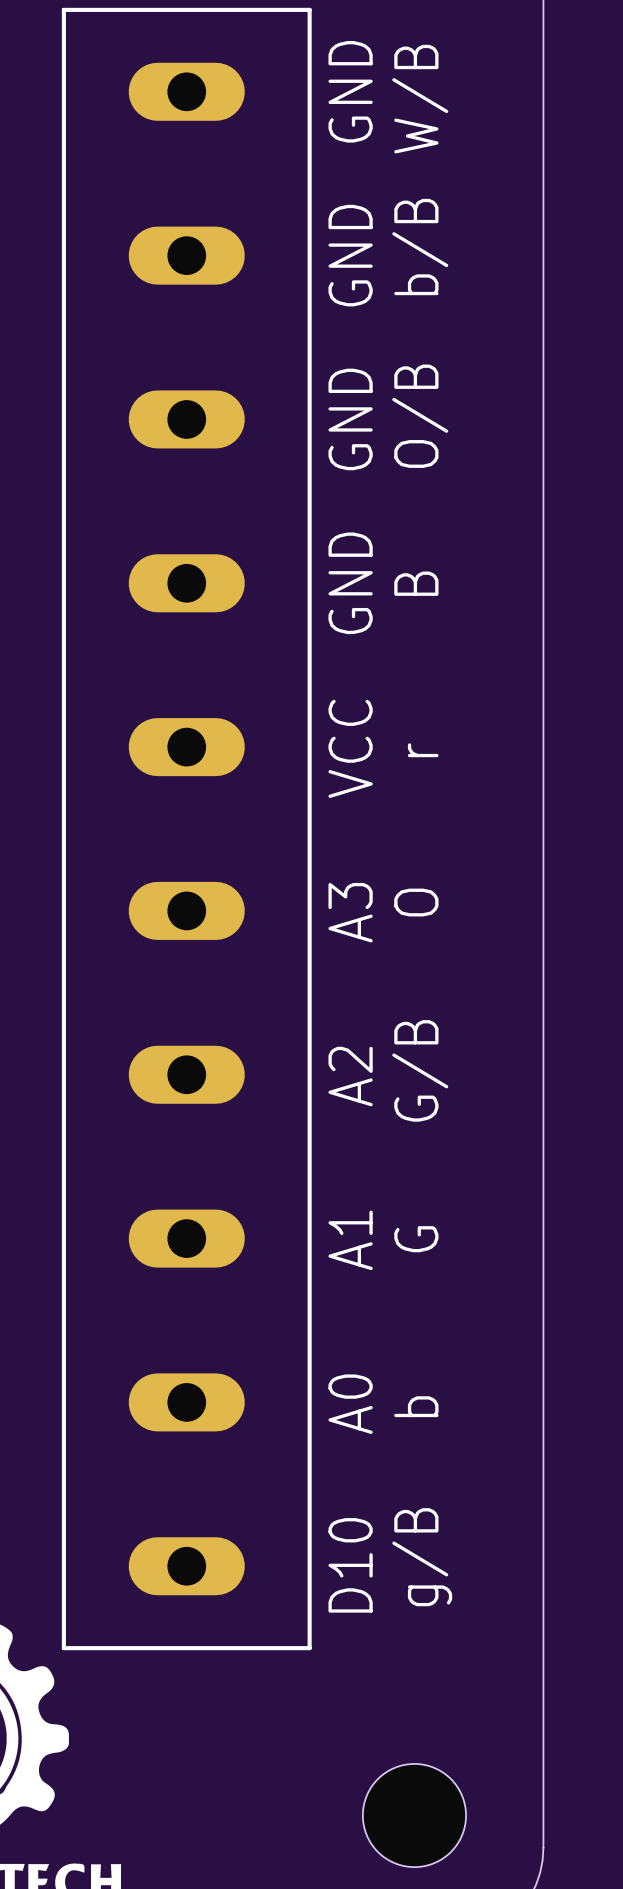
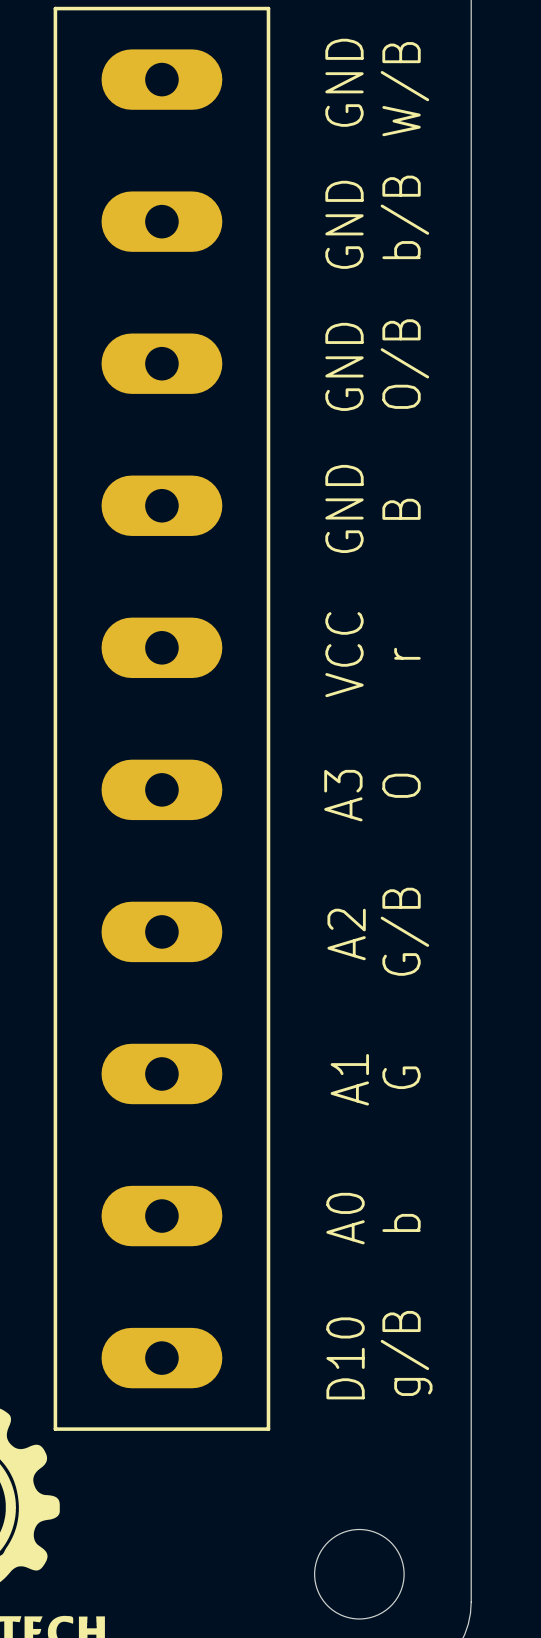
part footprint: [61, 7, 312, 1651] -> [53, 6, 271, 1431]
text position: GND (350, 91) -> GND (344, 82)
text position: W/B (420, 99) -> W/B (404, 89)
text position: b/B (420, 247) -> b/B (404, 217)
text position: GND (350, 255) -> GND (344, 224)
text position: O/B (420, 416) -> O/B (404, 364)
text position: GND (350, 419) -> GND (344, 366)
text position: GND (350, 583) -> GND (344, 508)
text position: B (416, 583) -> B (401, 509)
text position: VCC (350, 748) -> VCC (344, 654)
text position: r (423, 750) -> r (407, 653)
text position: O (416, 902) -> O (401, 785)
text position: A3 (350, 912) -> A3 (343, 795)
text position: G/B (420, 1070) -> G/B (404, 931)
text position: A2 (350, 1076) -> A2 (346, 934)
text position: G (416, 1239) -> G (401, 1077)
text position: A1 (350, 1240) -> A1 (349, 1079)
text position: A0 (350, 1404) -> A0 (345, 1218)
text position: b (416, 1406) -> b (401, 1222)
text position: g/B (422, 1557) -> g/B (406, 1353)
text position: D10 (350, 1565) -> D10 (345, 1358)

